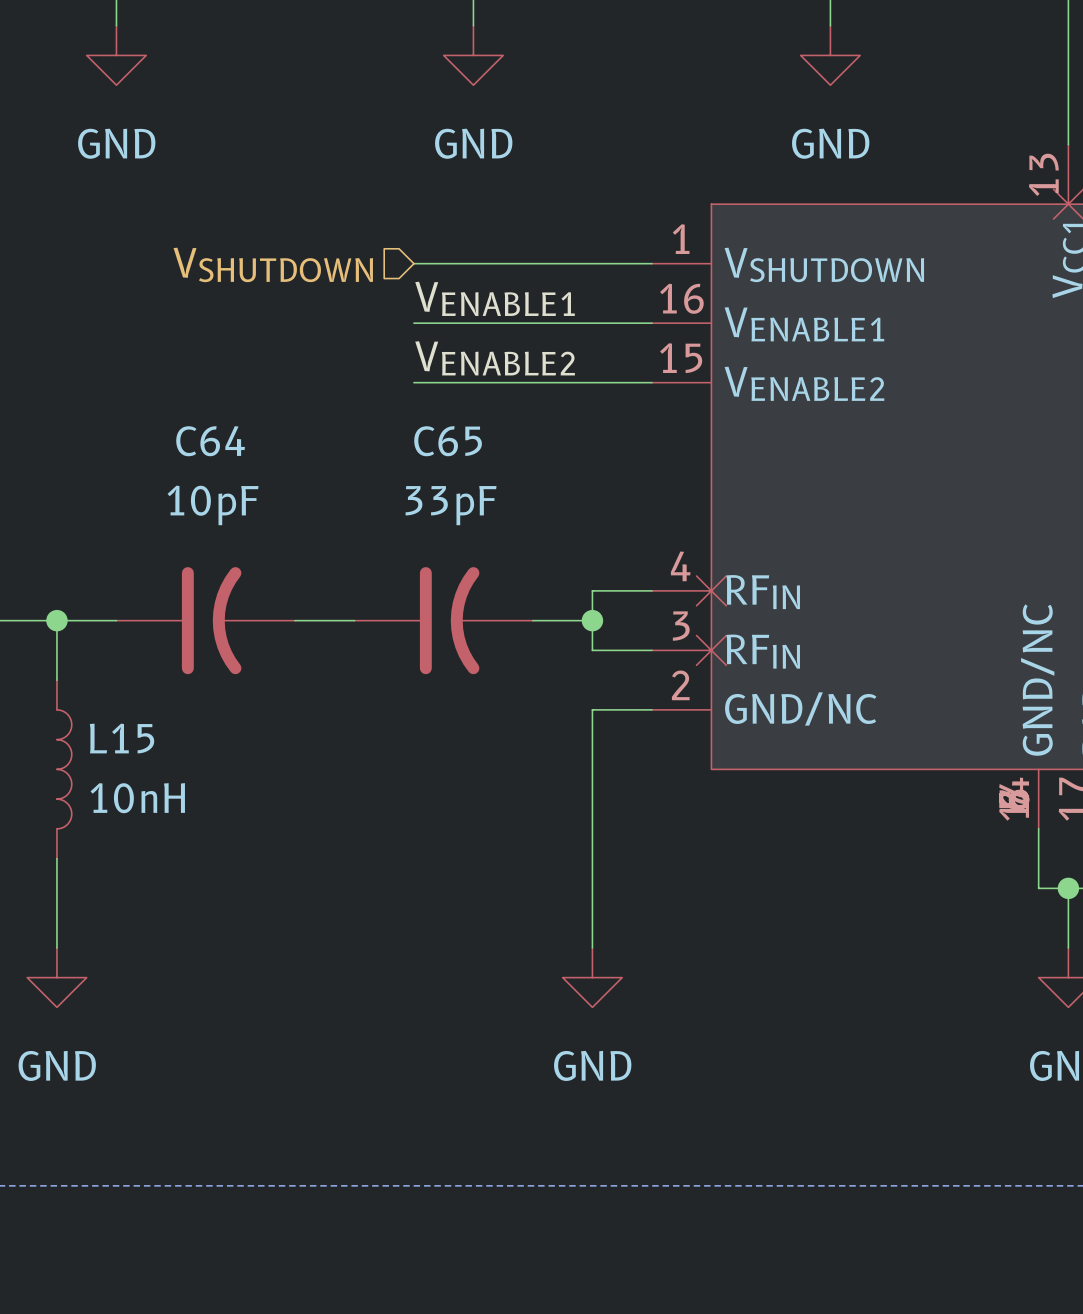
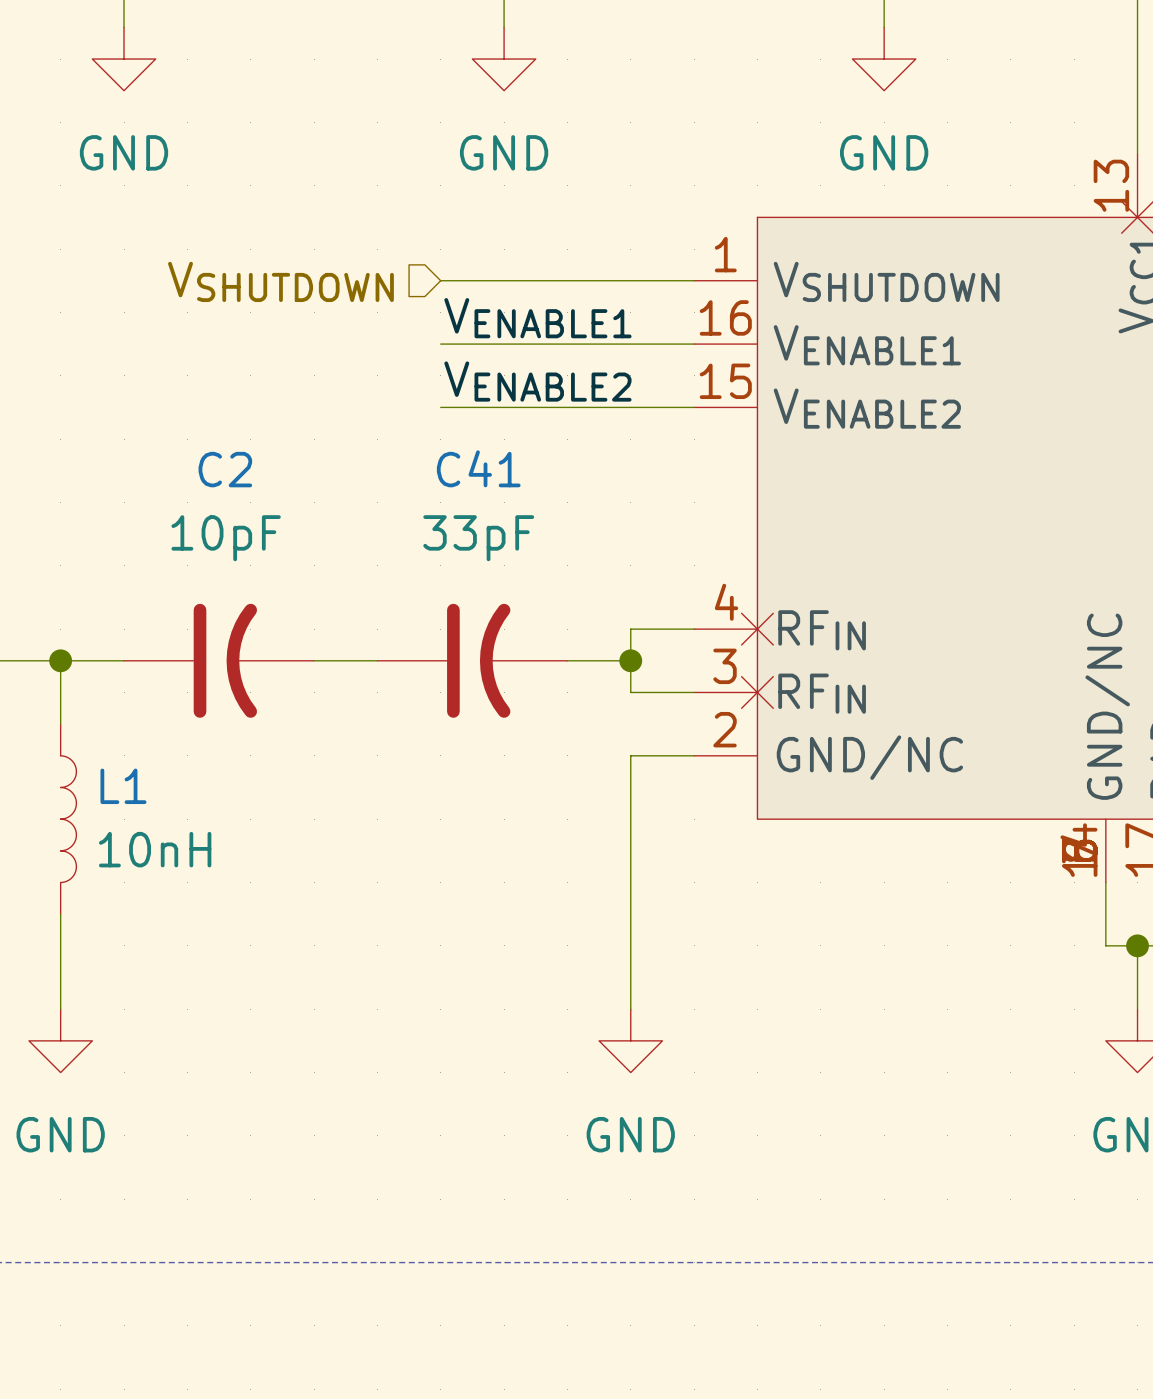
C64 name: C64 (210, 441) -> C2 (225, 469)
C65 name: C65 (448, 441) -> C41 (478, 468)
L15 name: L15 (122, 738) -> L1 (123, 786)

